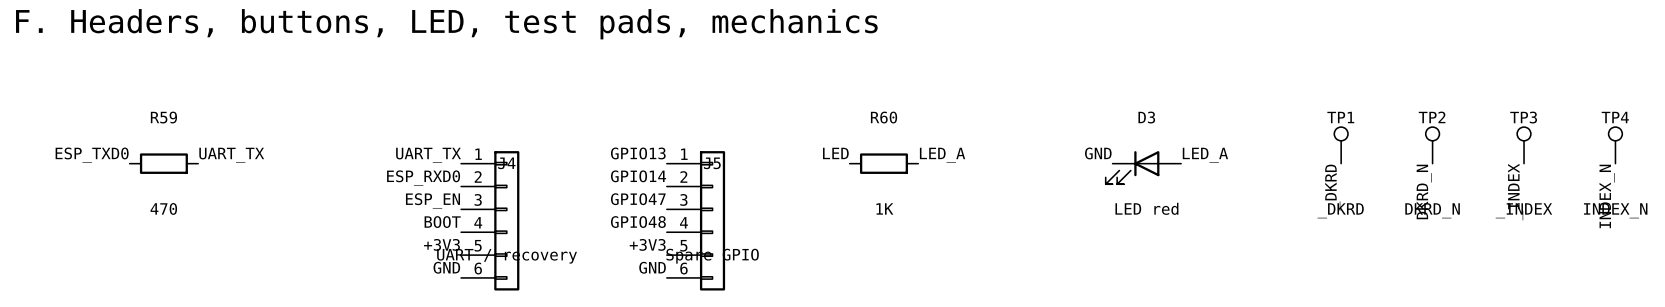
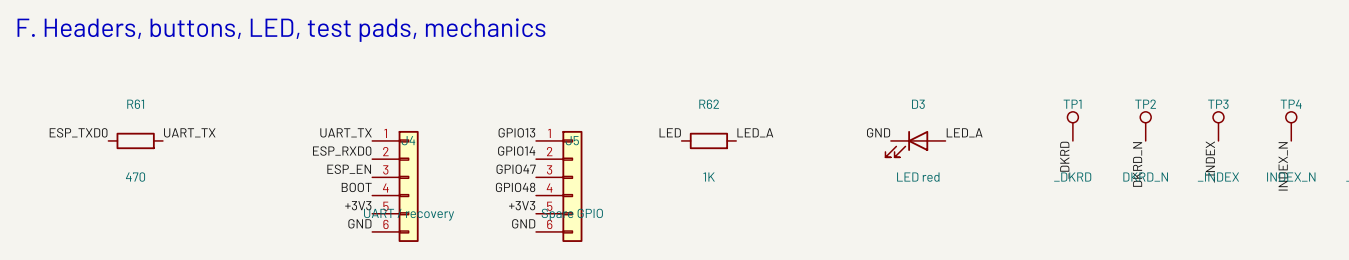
R59 name: R59 (163, 117) -> R61 (135, 104)
R60 name: R60 (884, 117) -> R62 (709, 104)

